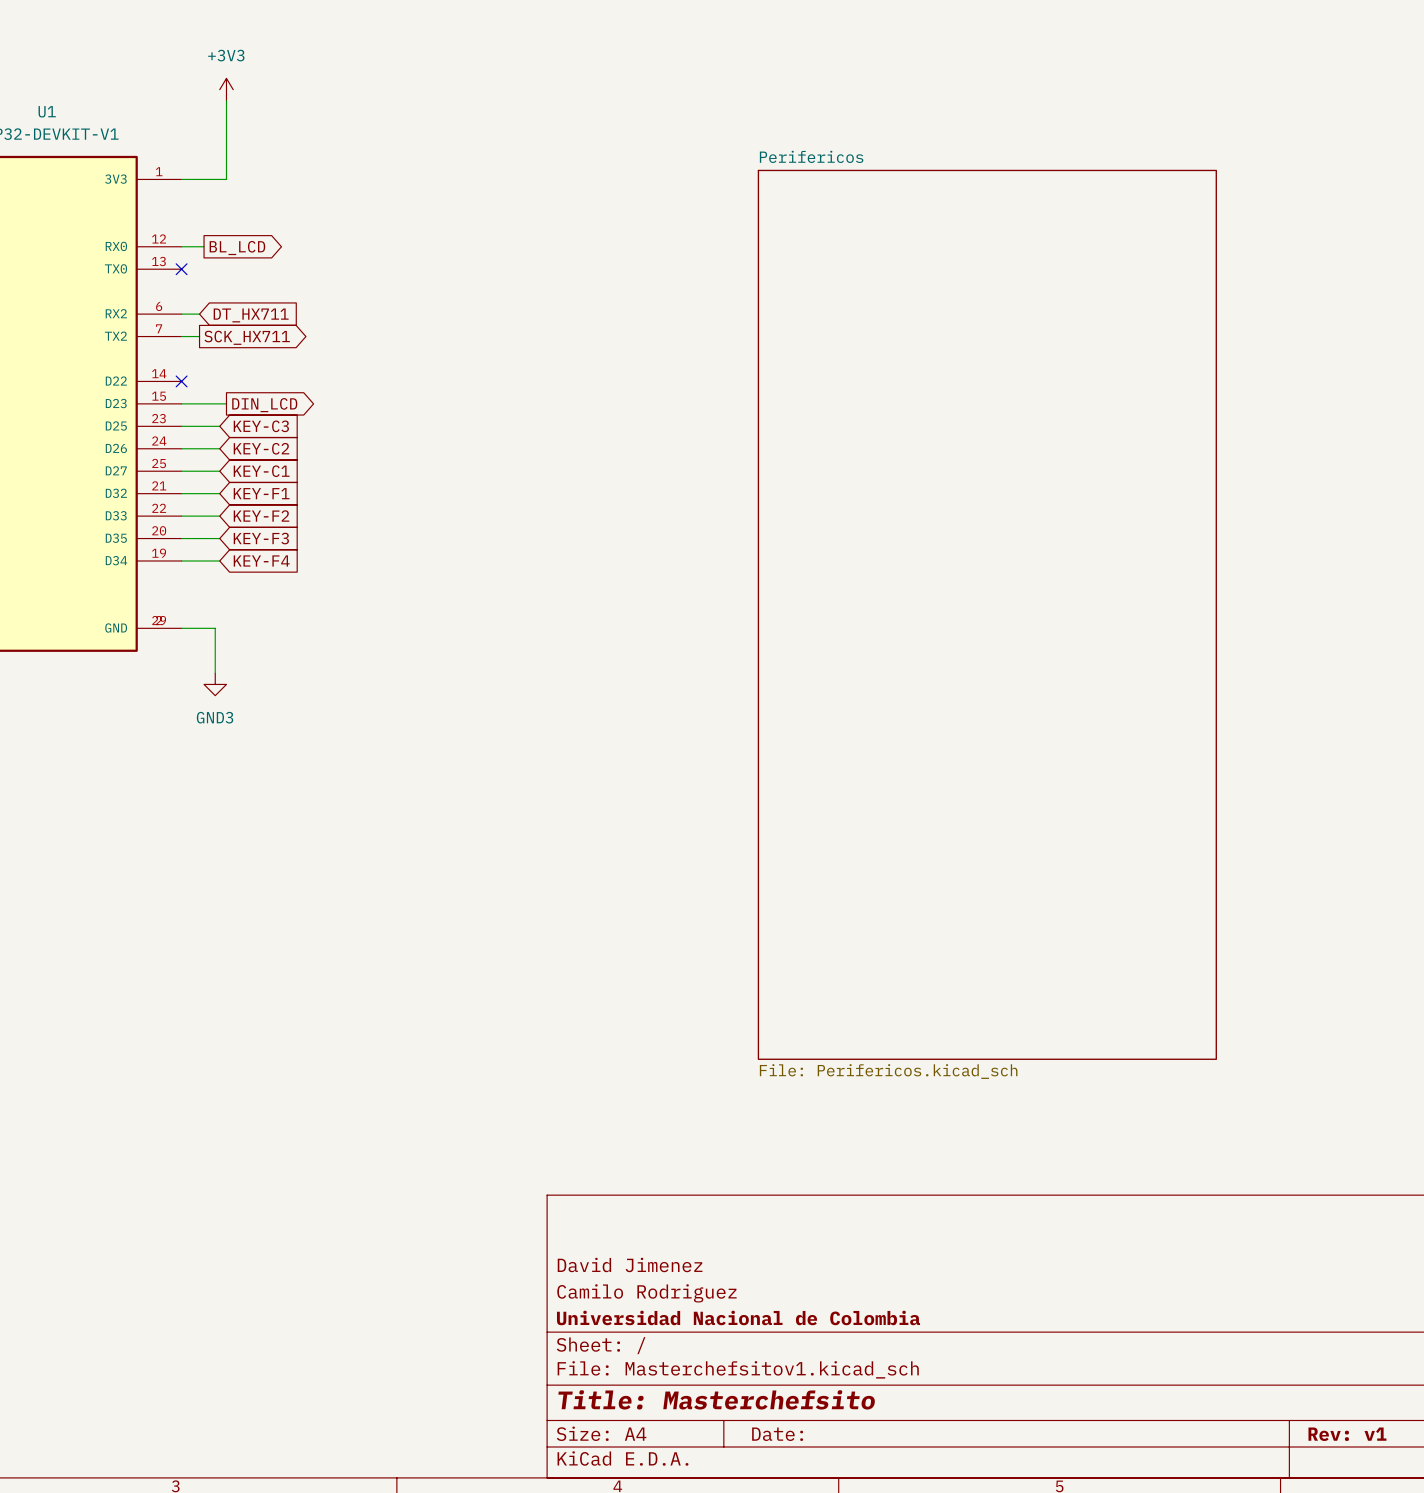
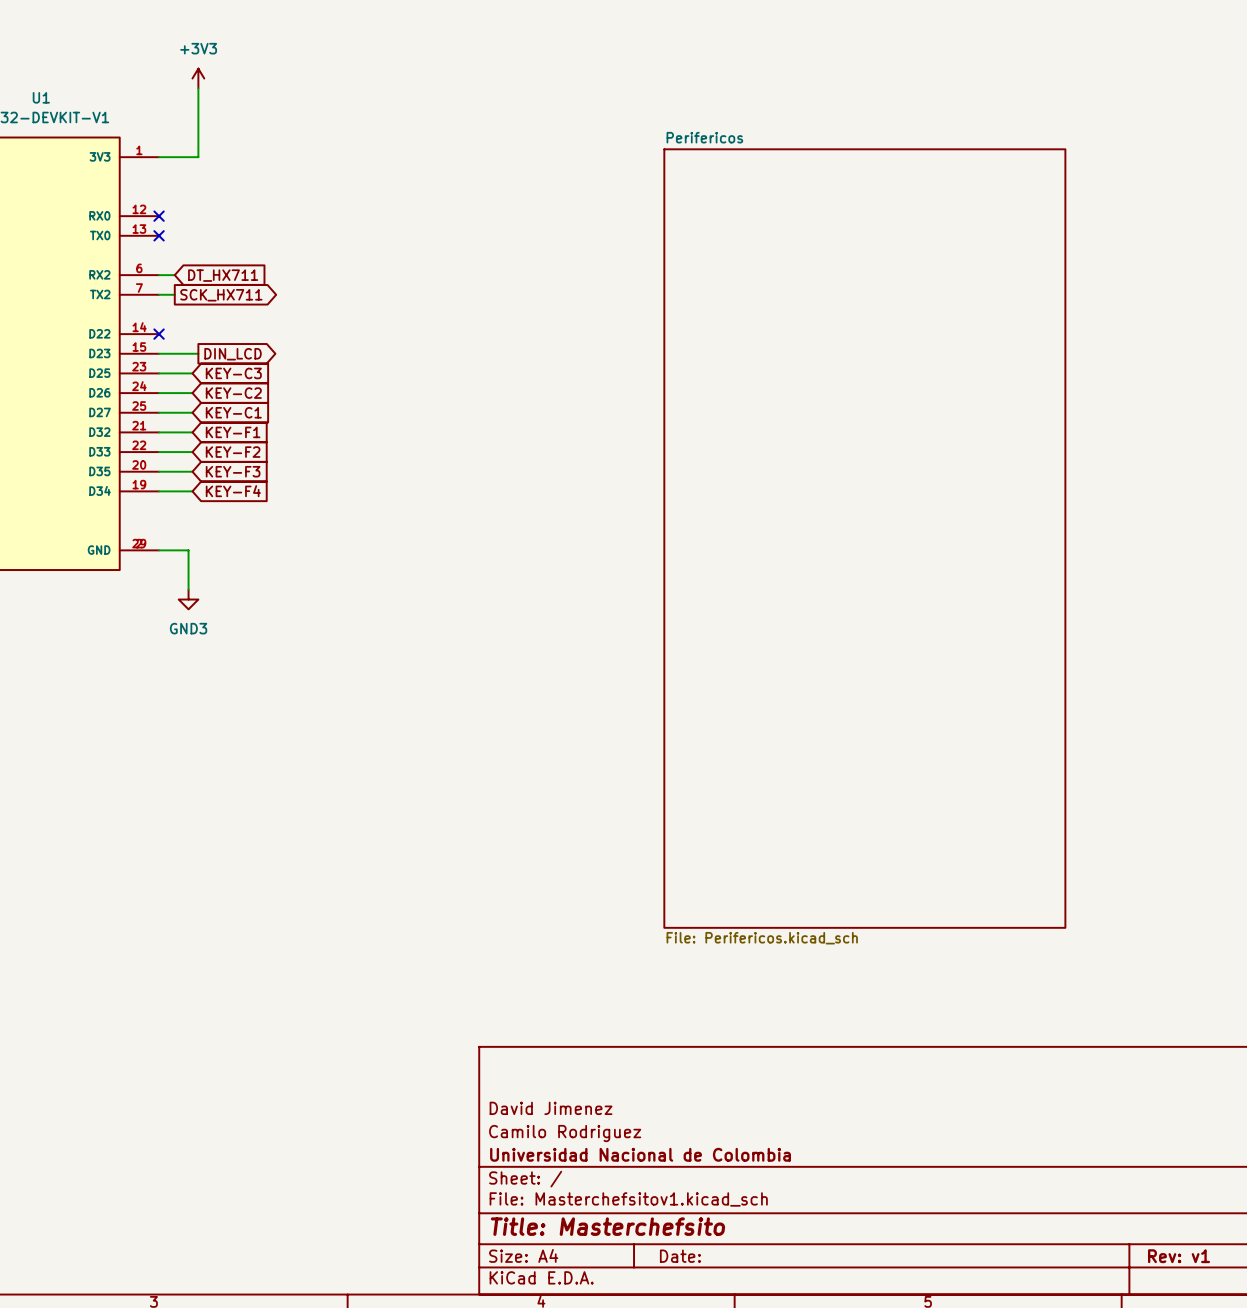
wire: (181, 246) (204, 246) -> none
no-connect mark: none -> (159, 216)
global label: BL_LCD (237, 248) -> none

